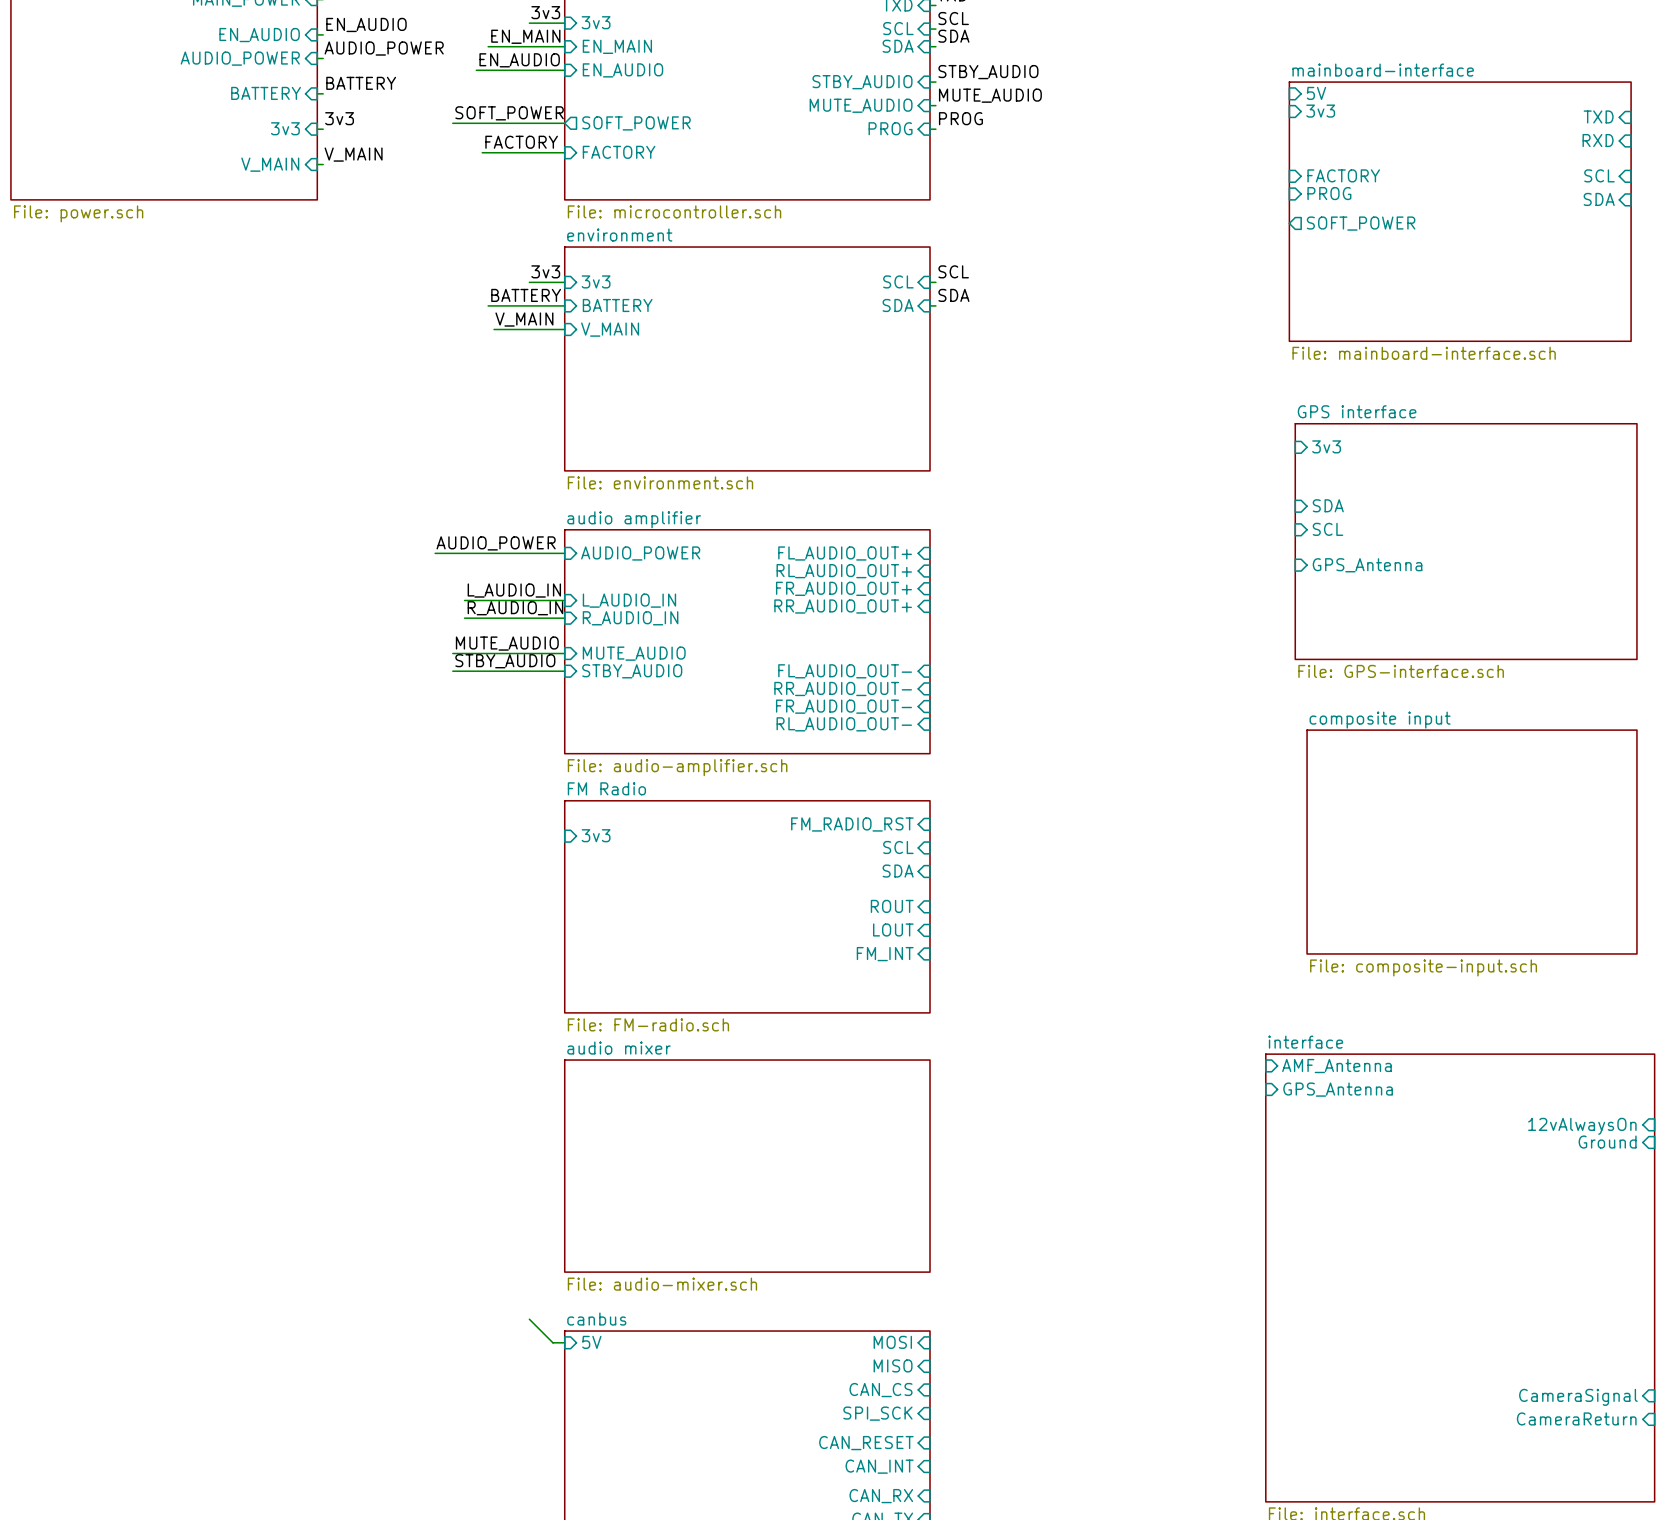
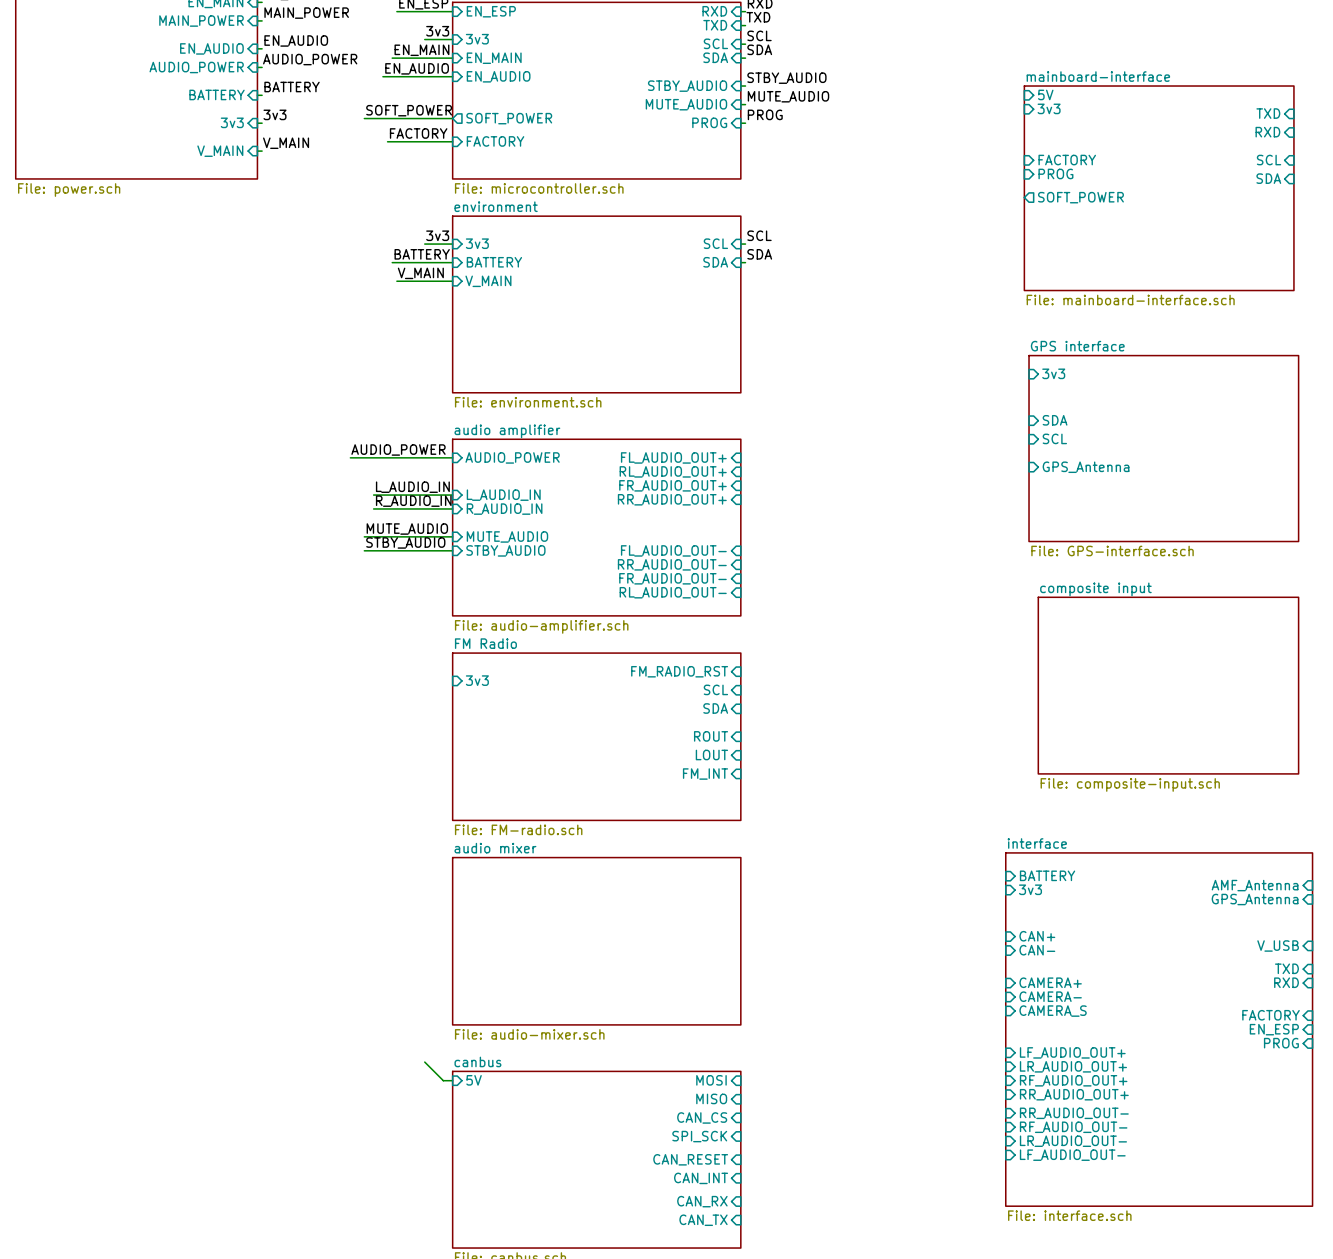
sheet pin: AMF_Antenna (1336, 1066) -> none
sheet pin: none -> BATTERY (1047, 875)
sheet pin: GPS_Antenna (1338, 1089) -> none
sheet pin: none -> AMF_Antenna (1255, 885)
sheet pin: none -> 3v3 (1030, 889)
sheet pin: none -> GPS_Antenna (1255, 899)
sheet pin: 12vAlwaysOn (1582, 1126) -> none
sheet pin: Ground (1607, 1142) -> none
sheet pin: none -> CAN+ (1037, 936)
sheet pin: none -> V_USB (1278, 945)
sheet pin: none -> CAN- (1037, 950)
sheet pin: none -> TXD (1286, 968)
sheet pin: none -> CAMERA+ (1050, 982)
sheet pin: none -> RXD (1286, 982)
sheet pin: none -> CAMERA- (1050, 996)
sheet pin: none -> CAMERA_S (1053, 1011)
sheet pin: none -> FACTORY (1271, 1015)
sheet pin: none -> EN_ESP (1274, 1029)
sheet pin: none -> PROG (1281, 1043)
sheet pin: none -> LF_AUDIO_OUT+ (1072, 1052)
sheet pin: none -> LR_AUDIO_OUT+ (1073, 1066)
sheet pin: none -> RF_AUDIO_OUT+ (1073, 1080)
sheet pin: none -> RR_AUDIO_OUT+ (1074, 1094)
sheet pin: none -> RR_AUDIO_OUT- (1074, 1113)
sheet pin: CameraSignal (1578, 1397) -> none
sheet pin: none -> RF_AUDIO_OUT- (1073, 1127)
sheet pin: CameraReturn (1576, 1418) -> none
sheet pin: none -> LR_AUDIO_OUT- (1073, 1141)
sheet pin: none -> LF_AUDIO_OUT- (1072, 1155)

